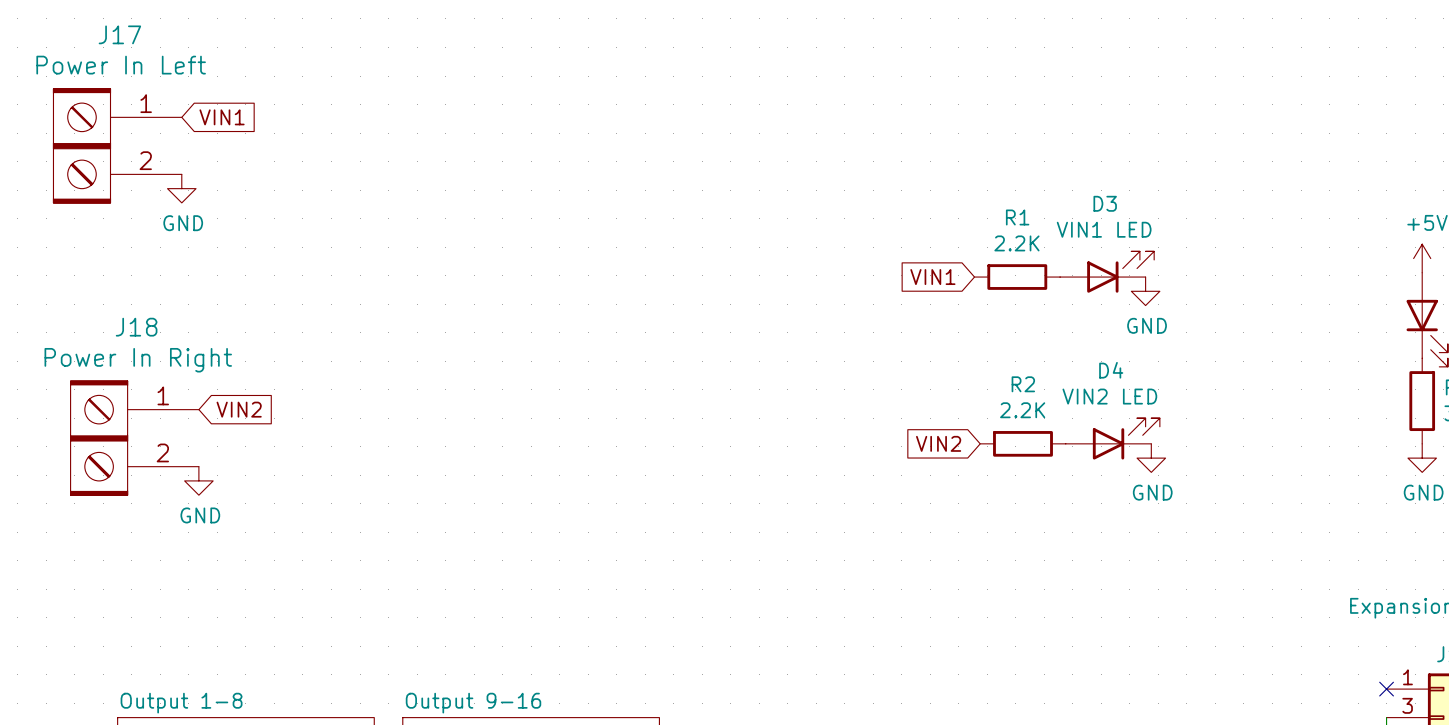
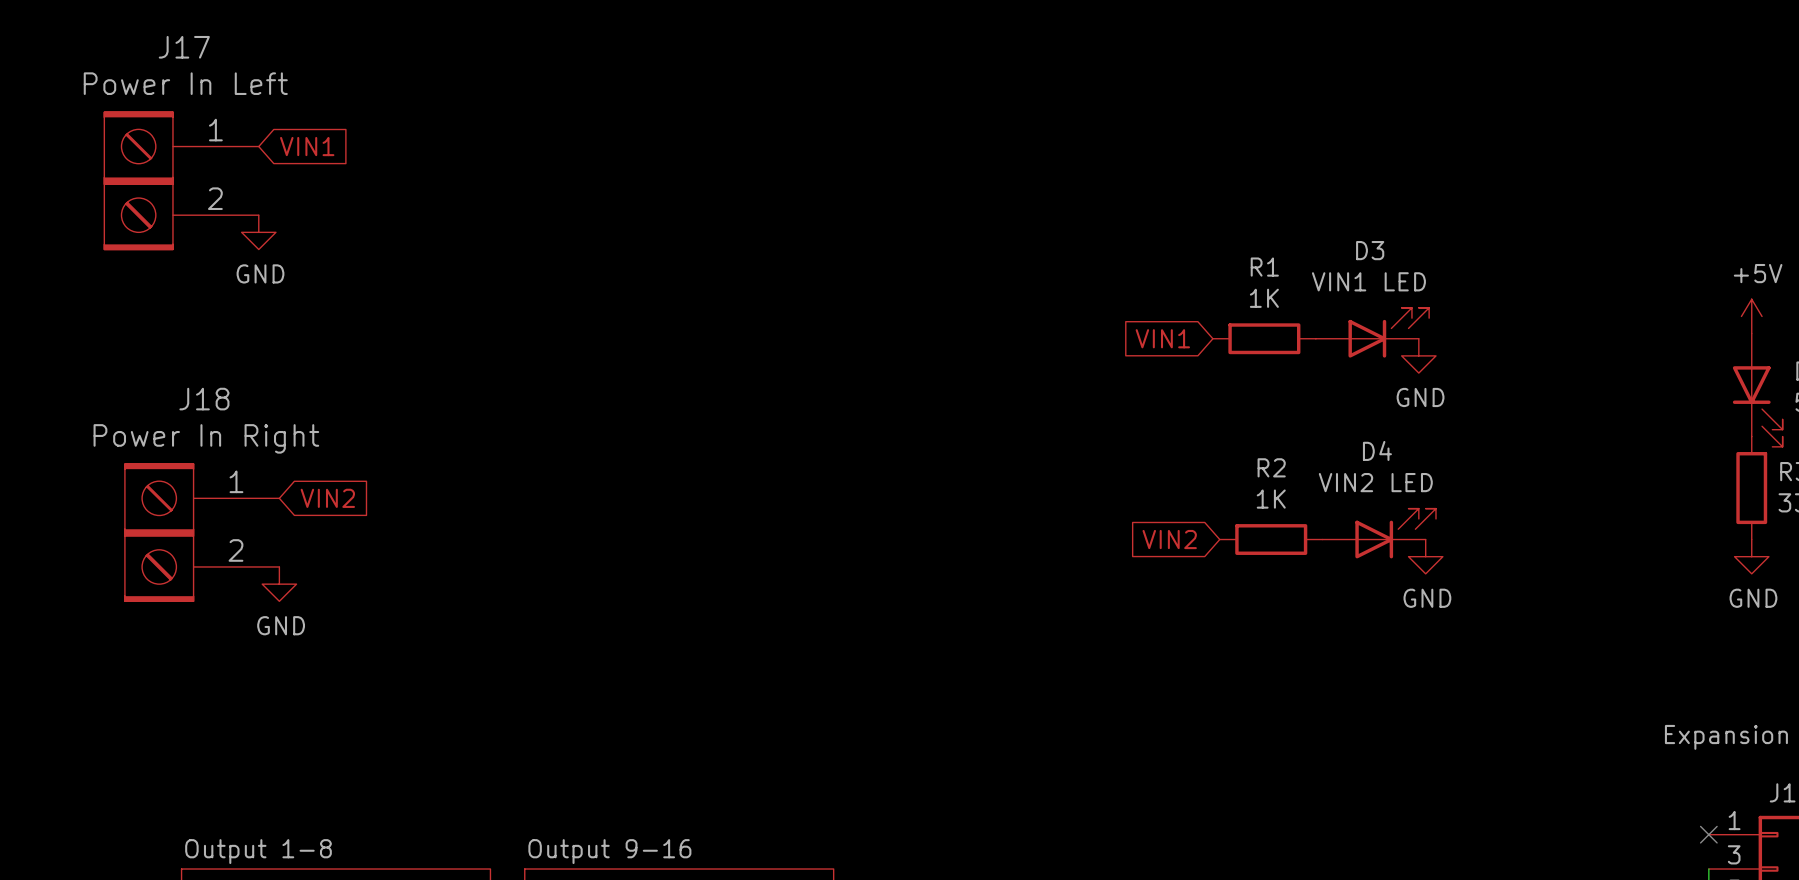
R1 value: 2.2K (1016, 243) -> 1K (1264, 298)
R2 value: 2.2K (1022, 410) -> 1K (1271, 499)

